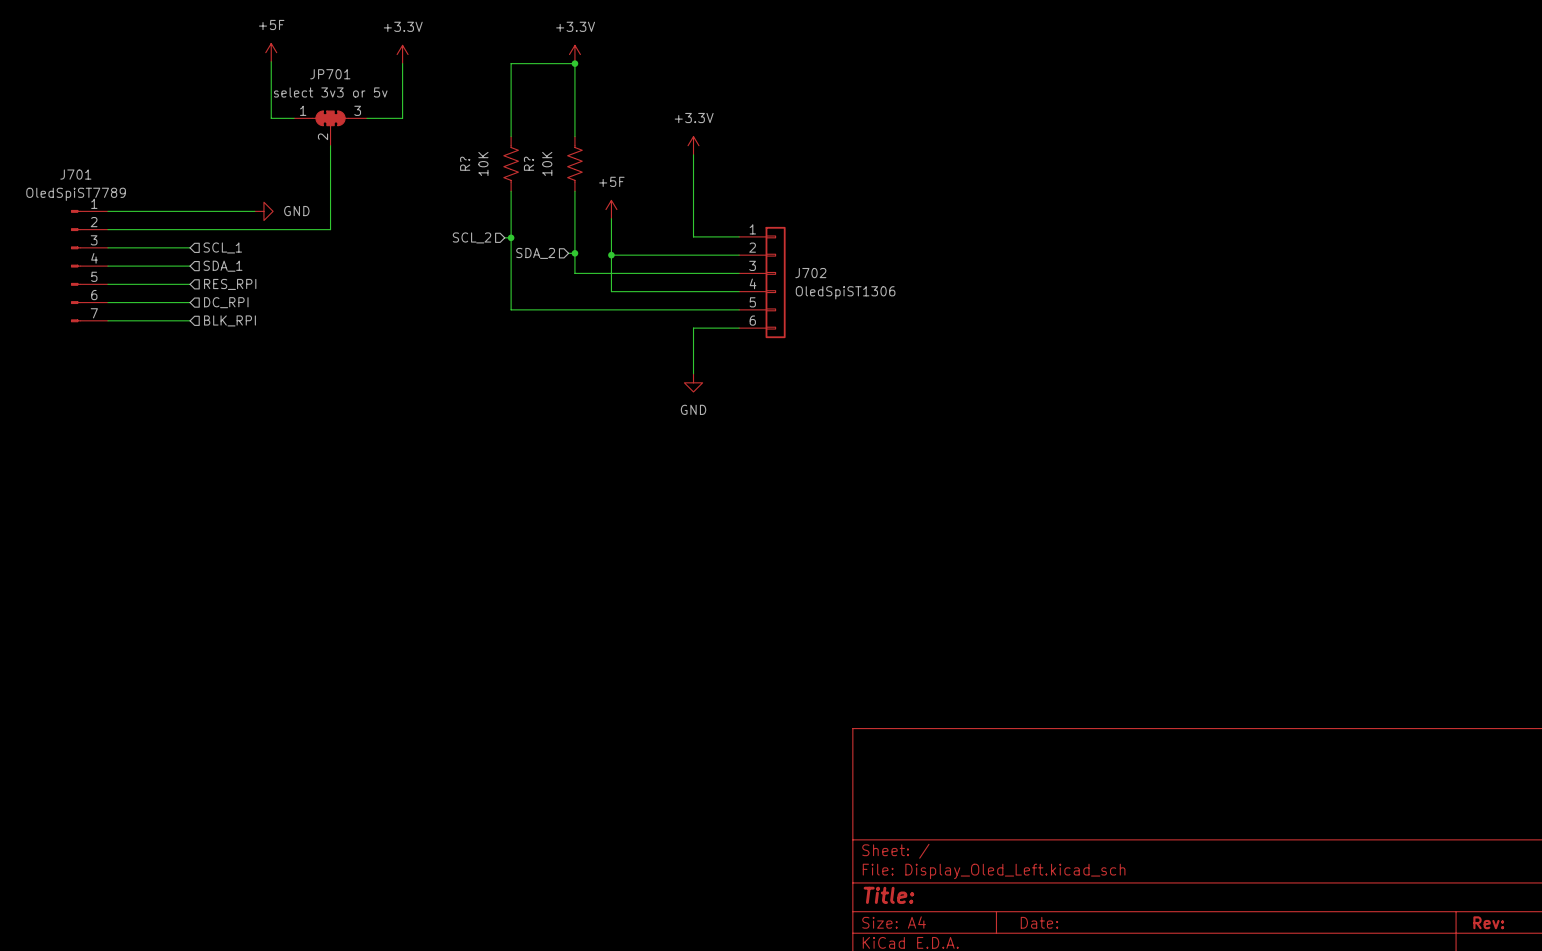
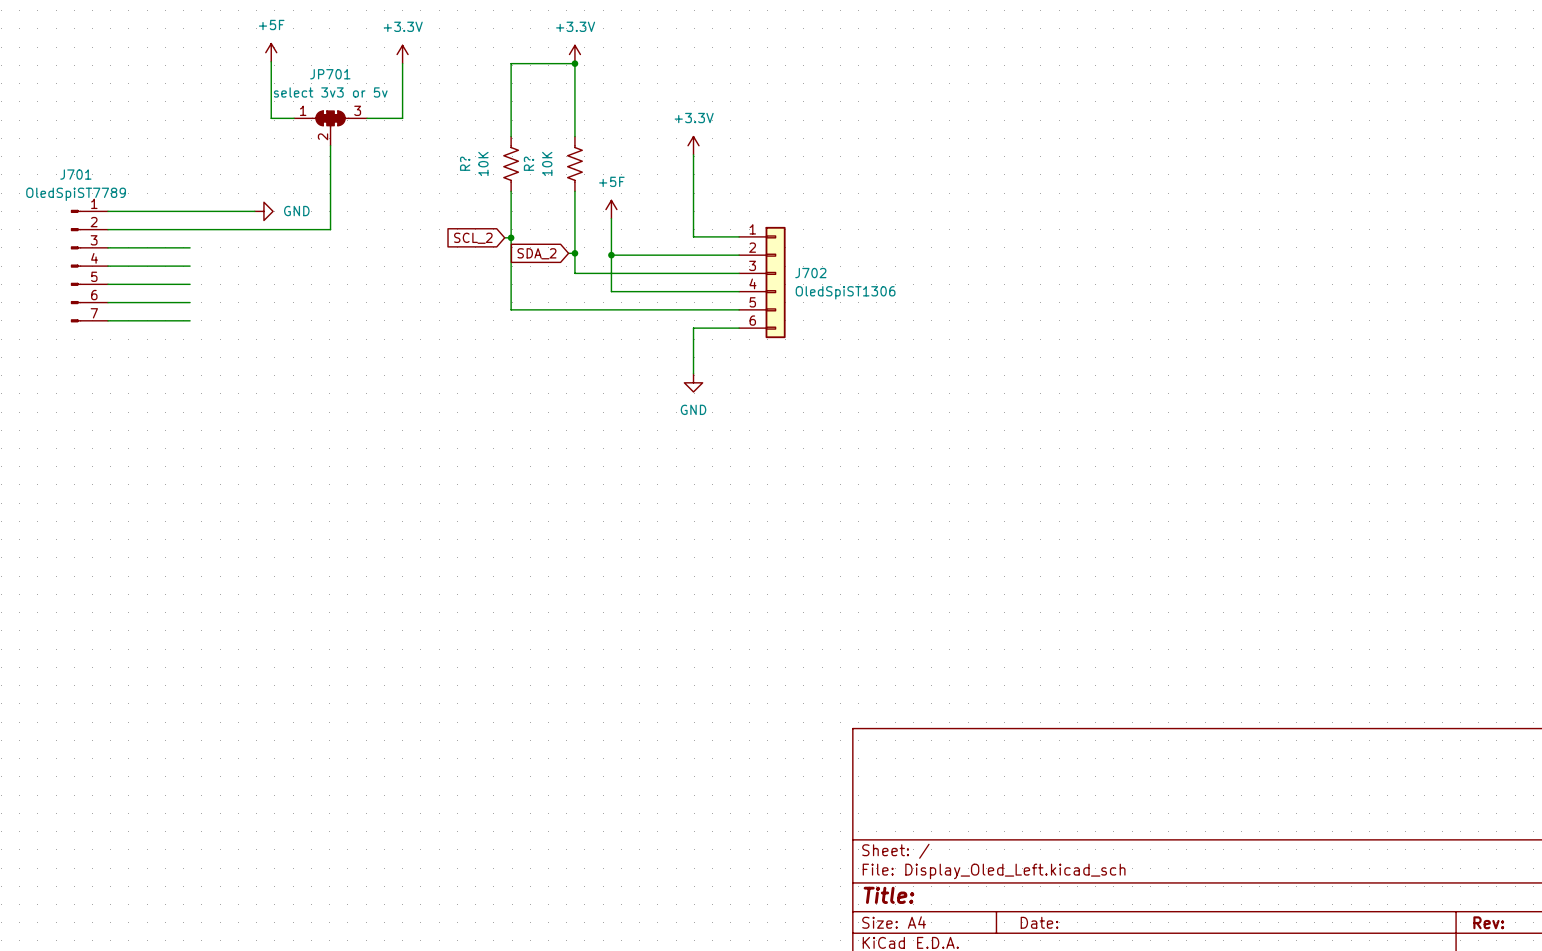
hierarchical label: SCL_2 (472, 237) -> none
global label: none -> SCL_2 (473, 238)
hierarchical label: SCL_1 (222, 247) -> none
hierarchical label: SDA_2 (535, 253) -> none
global label: none -> SDA_2 (536, 253)
hierarchical label: SDA_1 (223, 266) -> none
hierarchical label: RES_RPI (230, 284) -> none
hierarchical label: DC_RPI (226, 302) -> none
hierarchical label: BLK_RPI (229, 320) -> none

